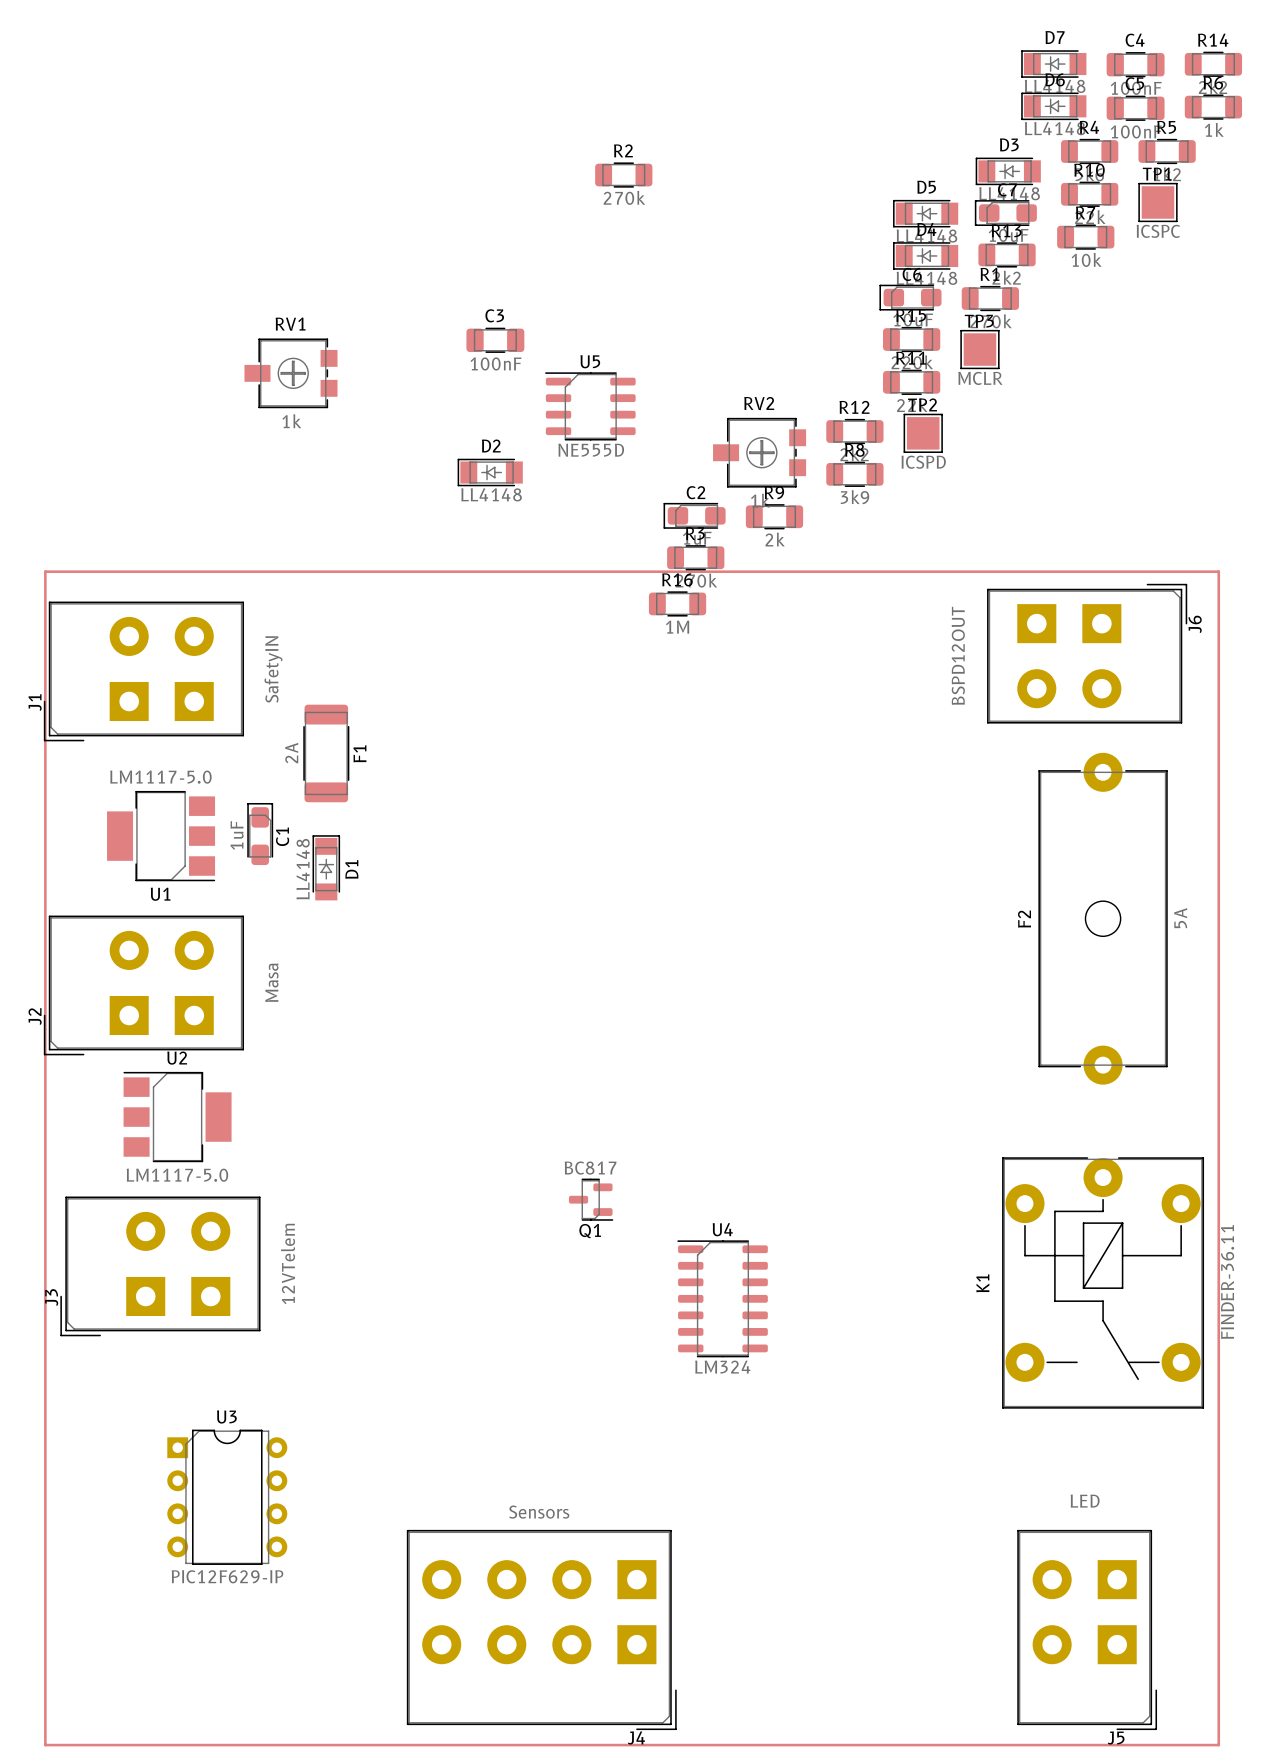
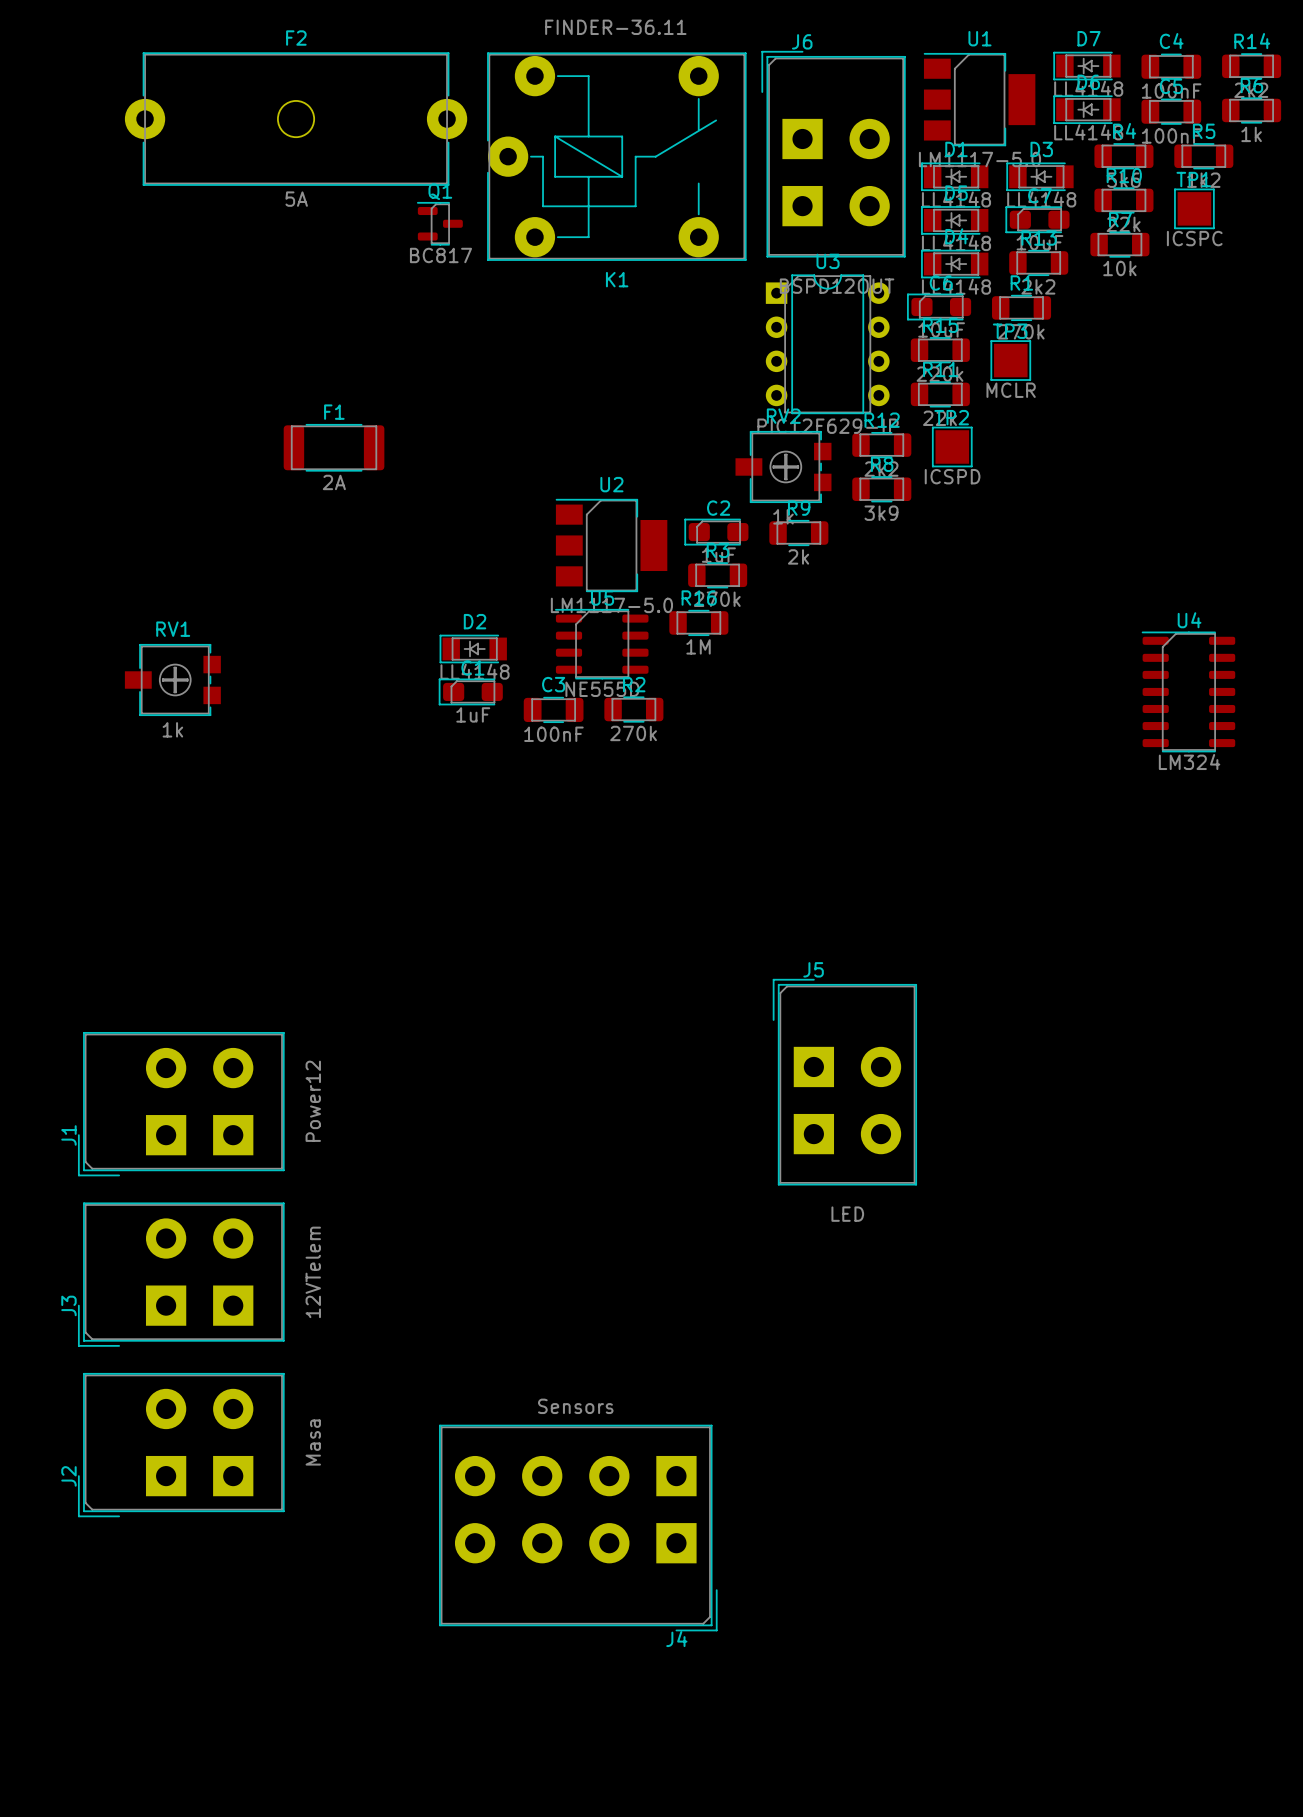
R2 position: (623, 175) -> (633, 709)
C3 position: (495, 340) -> (553, 709)
RV1 position: (290, 373) -> (172, 680)
U5 position: (590, 406) -> (601, 644)
D2 position: (490, 472) -> (473, 648)
track: (45, 571) (1218, 571) (1218, 1745) (45, 1745) (45, 571) -> none
J6 rotation: 0° (1087, 653) -> 90° counterclockwise (833, 154)
J6 position: (1087, 653) -> (833, 154)
J1 value: SafetyIN (273, 669) -> Power12 (313, 1101)
J1 position: (143, 671) -> (181, 1104)
F1 value position: 2A (291, 753) -> 2A (334, 482)
F1 rotation: 0° (326, 753) -> 90° clockwise (334, 447)
F1 position: (326, 753) -> (334, 447)
F1 name position: F1 (359, 753) -> F1 (334, 412)
C1 rotation: 0° (260, 834) -> 90° counterclockwise (470, 691)
C1 position: (260, 834) -> (470, 691)
U1 rotation: 0° (161, 836) -> 180° (979, 99)
U1 position: (161, 836) -> (979, 99)
D1 rotation: 0° (326, 867) -> 90° counterclockwise (954, 176)
D1 position: (326, 867) -> (954, 176)
F2 rotation: 0° (1103, 918) -> 90° clockwise (296, 119)
F2 position: (1103, 918) -> (296, 119)
J2 position: (143, 985) -> (181, 1445)
U2 position: (177, 1117) -> (611, 545)
Q1 rotation: 0° (591, 1199) -> 180° (439, 223)
Q1 position: (591, 1199) -> (439, 223)
J3 position: (160, 1266) -> (181, 1274)
K1 rotation: 0° (1103, 1282) -> 90° counterclockwise (616, 156)
K1 position: (1103, 1282) -> (616, 156)
U4 position: (722, 1298) -> (1188, 691)
U3 position: (227, 1497) -> (827, 344)
J4 position: (541, 1629) -> (578, 1528)
J5 rotation: 0° (1087, 1629) -> 180° (844, 1082)
J5 position: (1087, 1629) -> (844, 1082)

